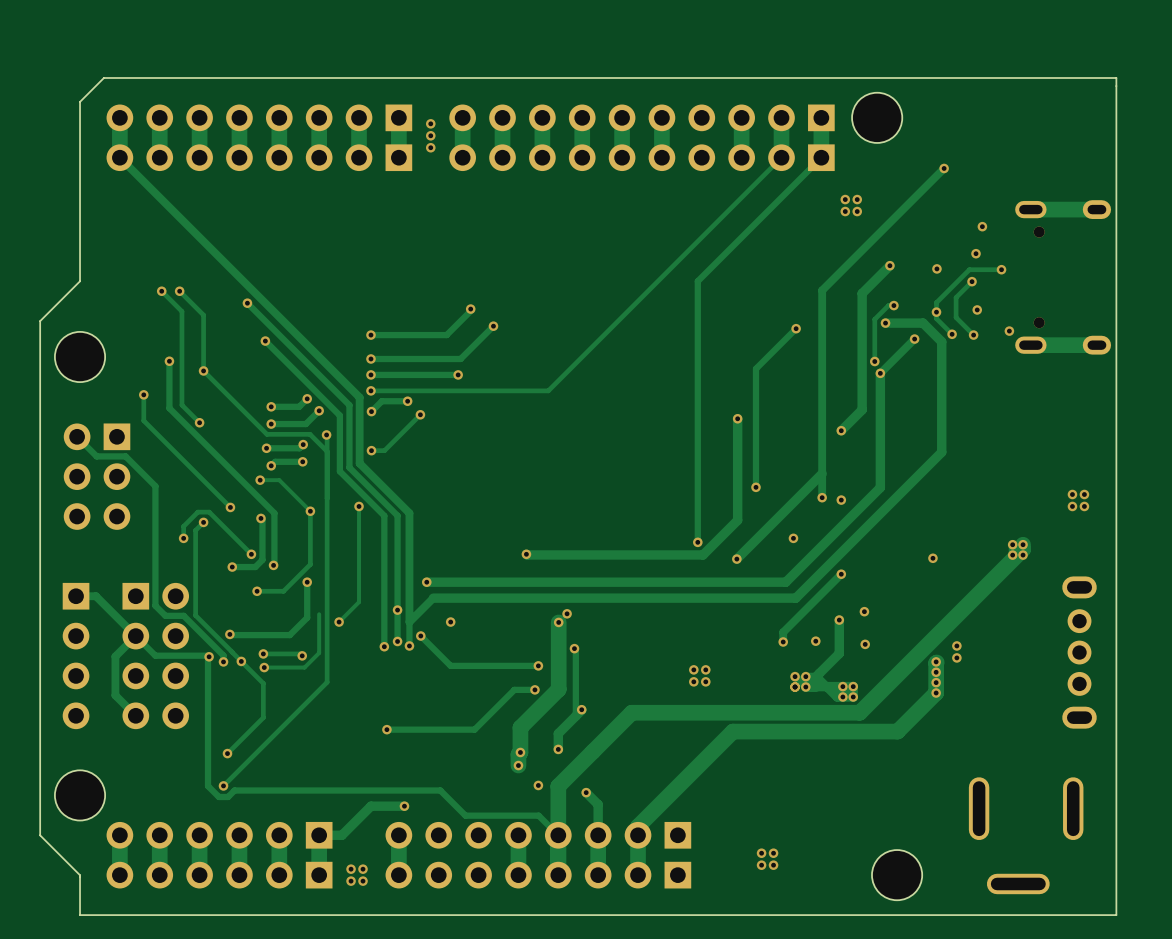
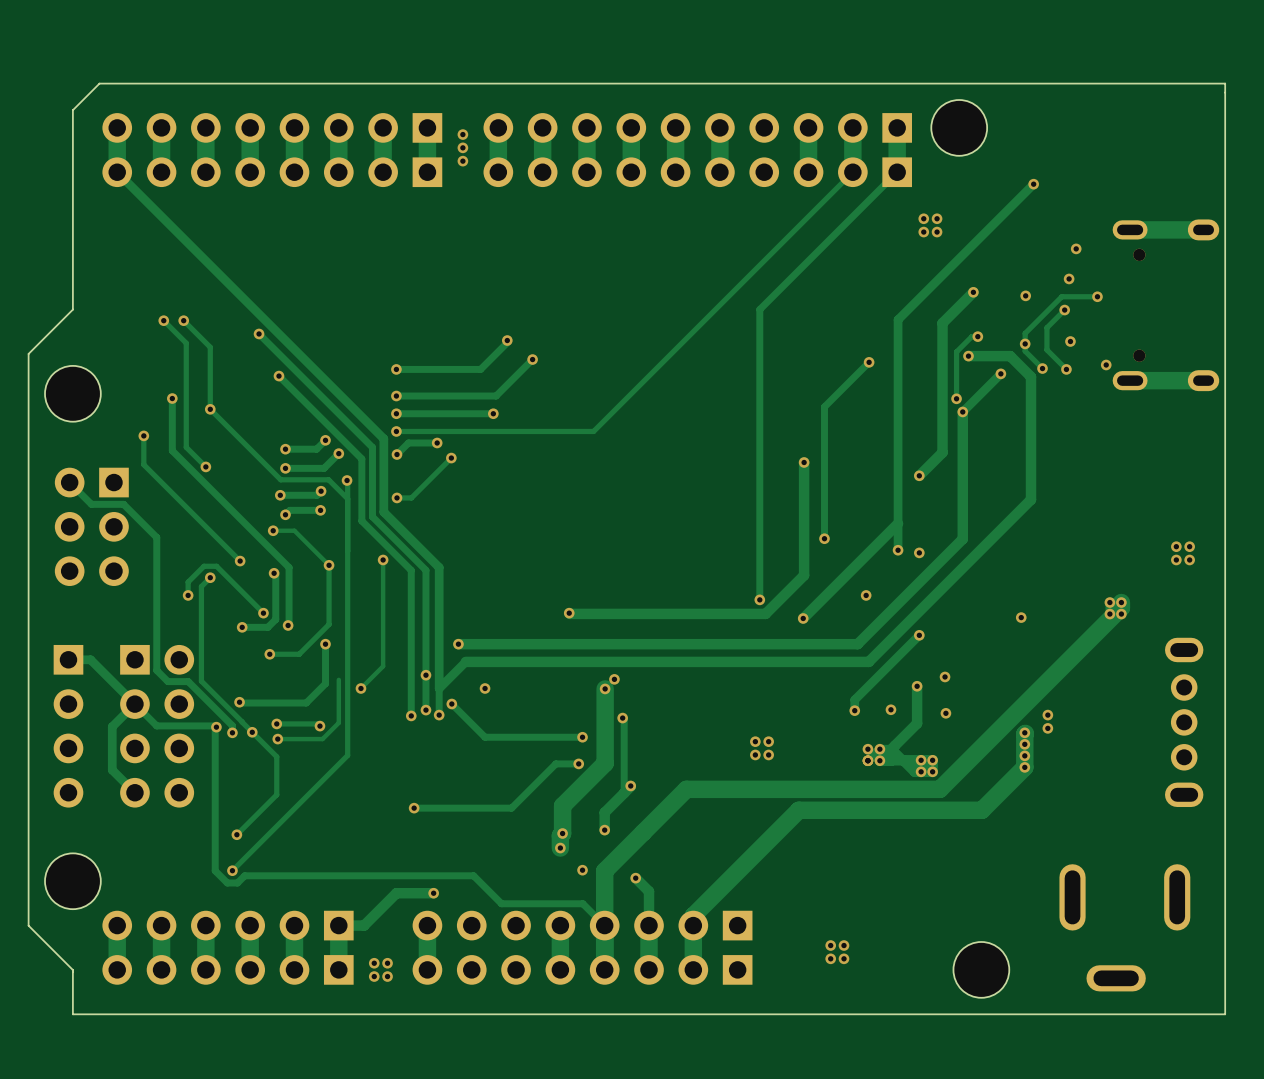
part footprint: [968, 777, 1084, 895] -> [1059, 864, 1191, 992]

